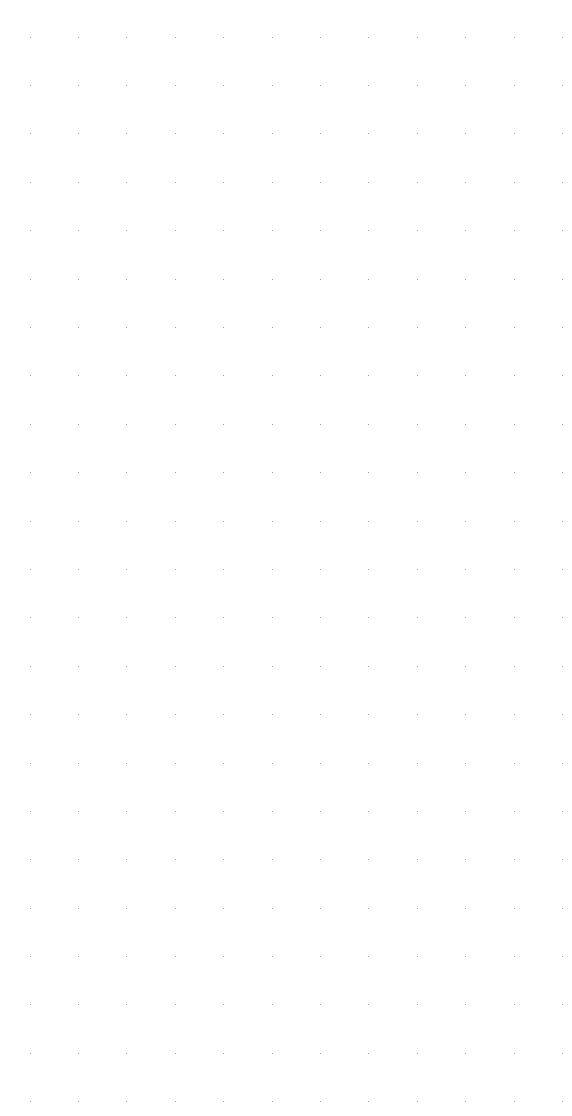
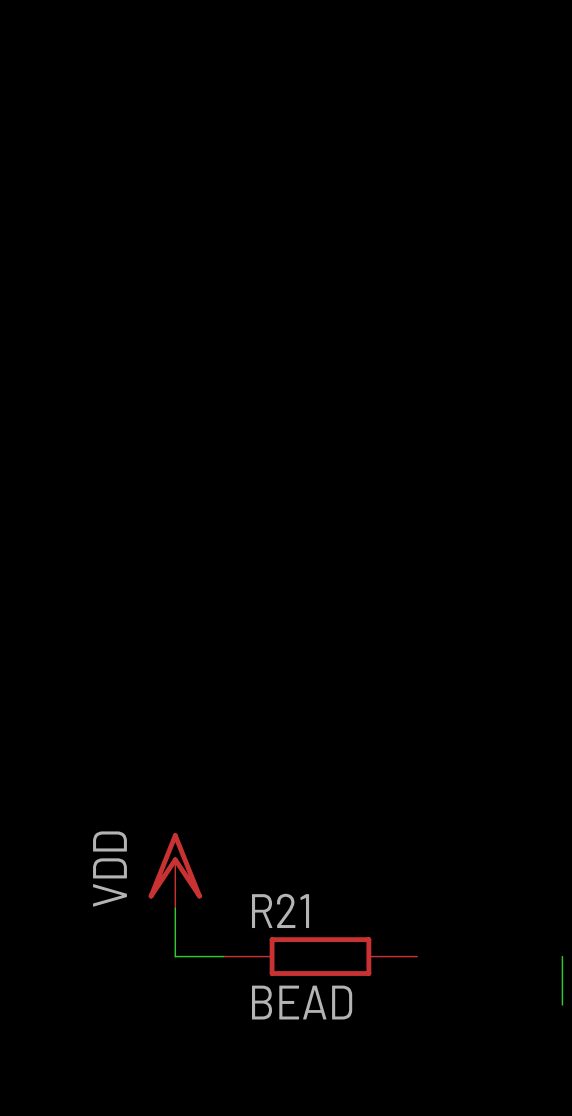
power symbol: none -> VDD (175, 870)
wire: none -> (175, 908) (175, 956) (223, 956)
R21: none -> BEAD (320, 956)
wire: none -> (562, 956) (562, 1004)

